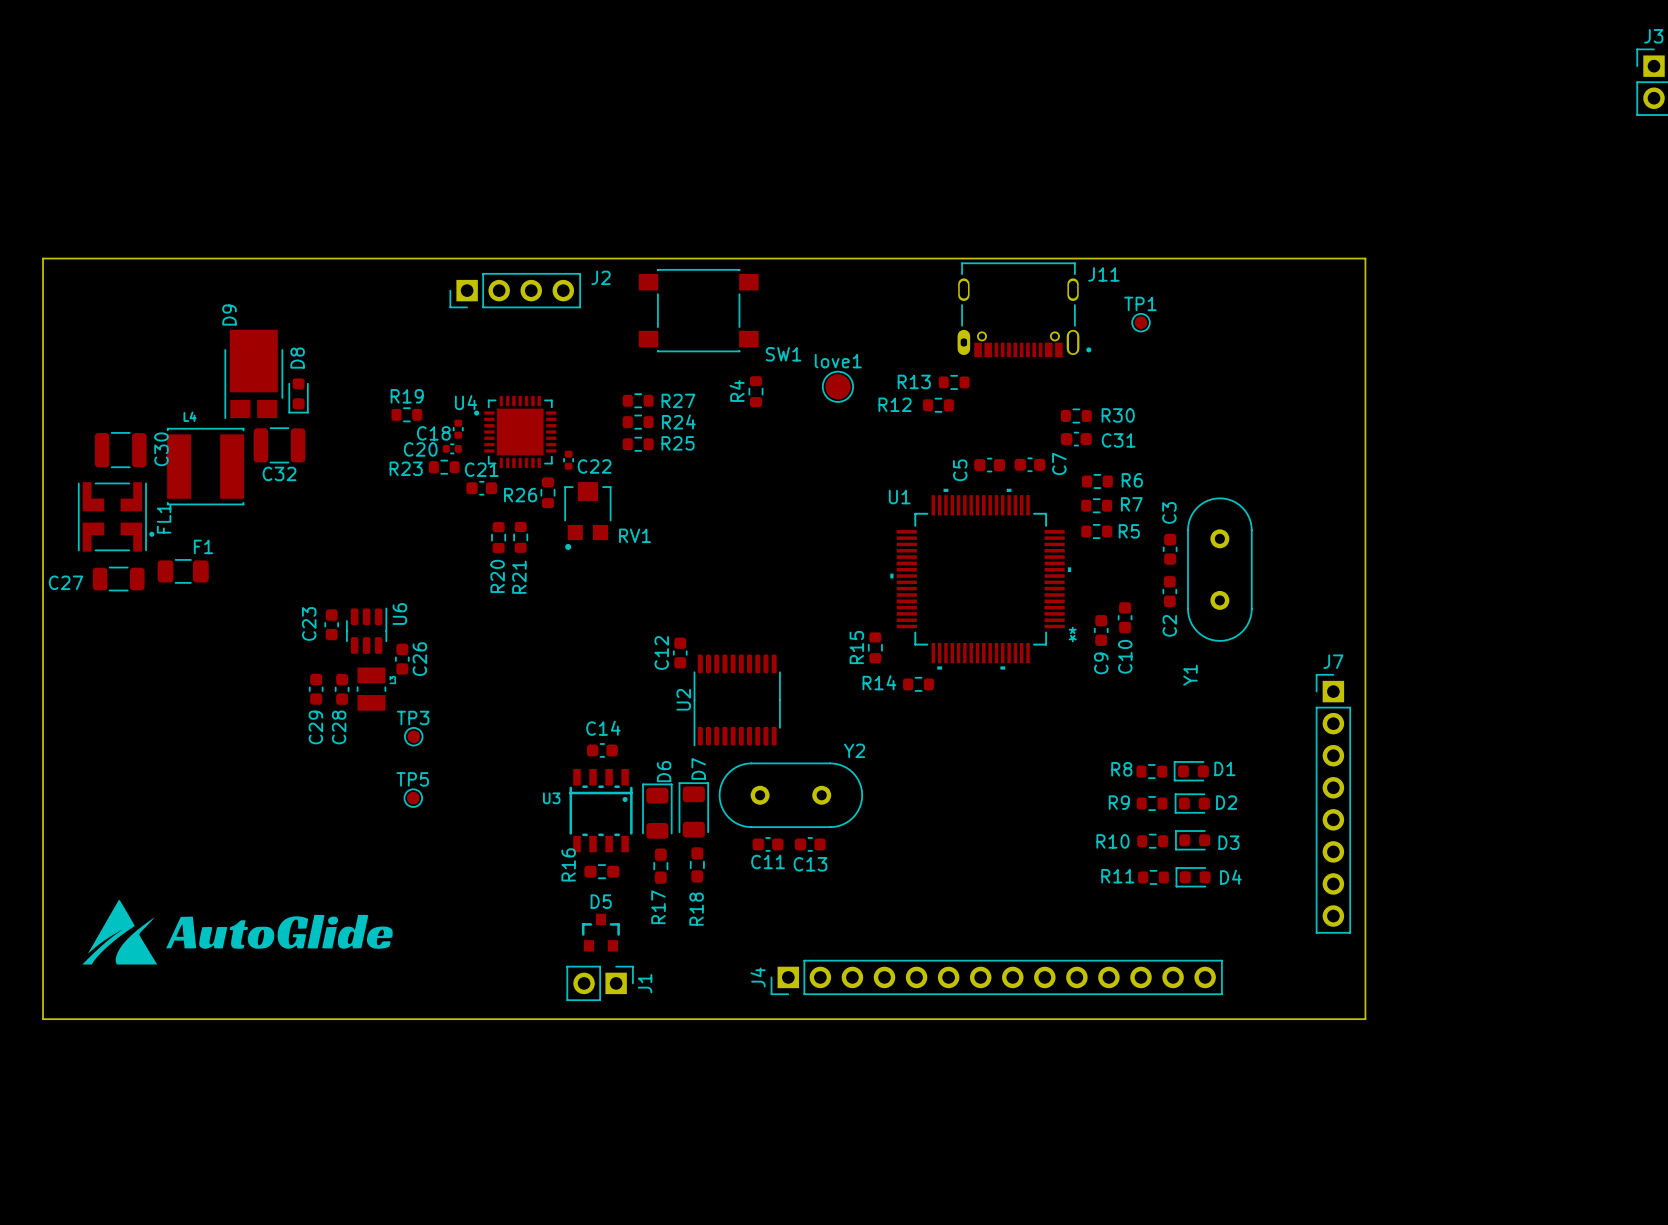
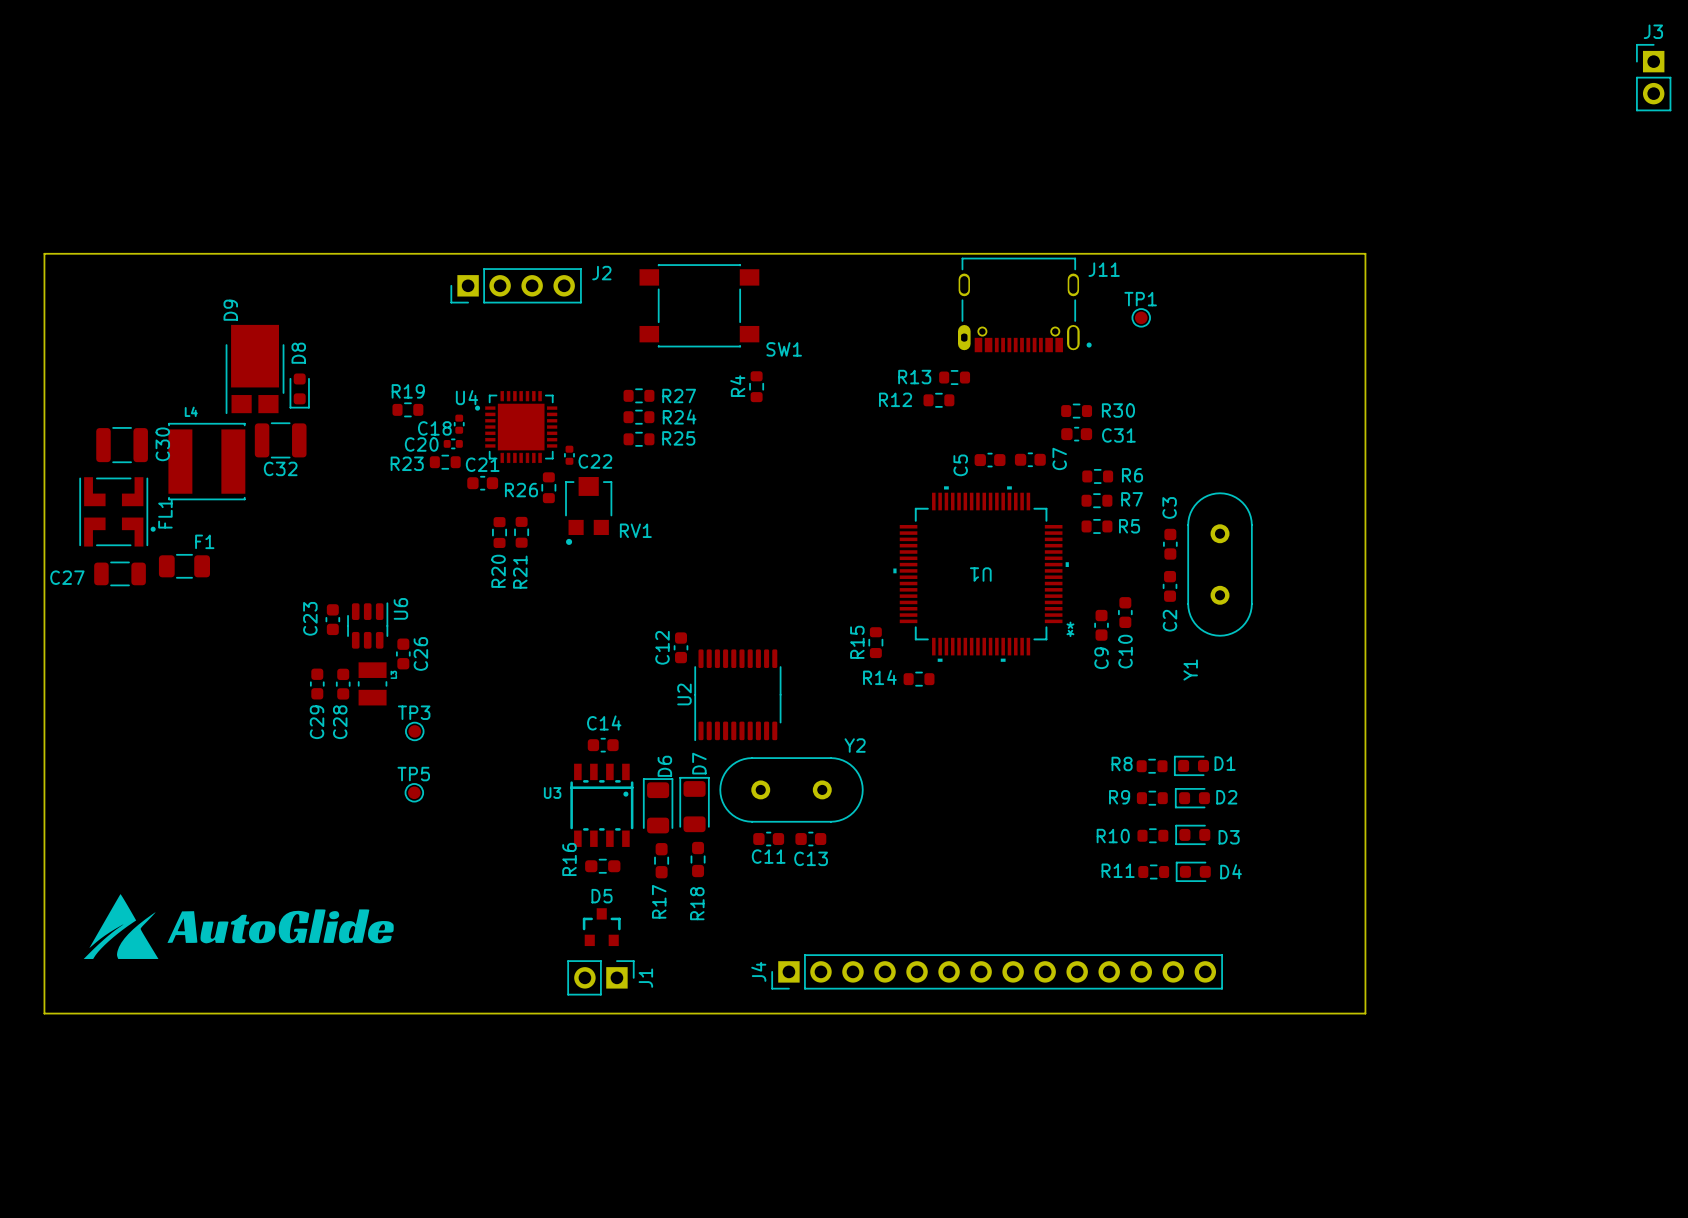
love1: (837, 386) -> none
U1 footprint: [890, 488, 1072, 670] -> [893, 486, 1069, 662]
U1 name position: U1 (899, 497) -> U1 (980, 574)
J7: (1333, 803) -> none

